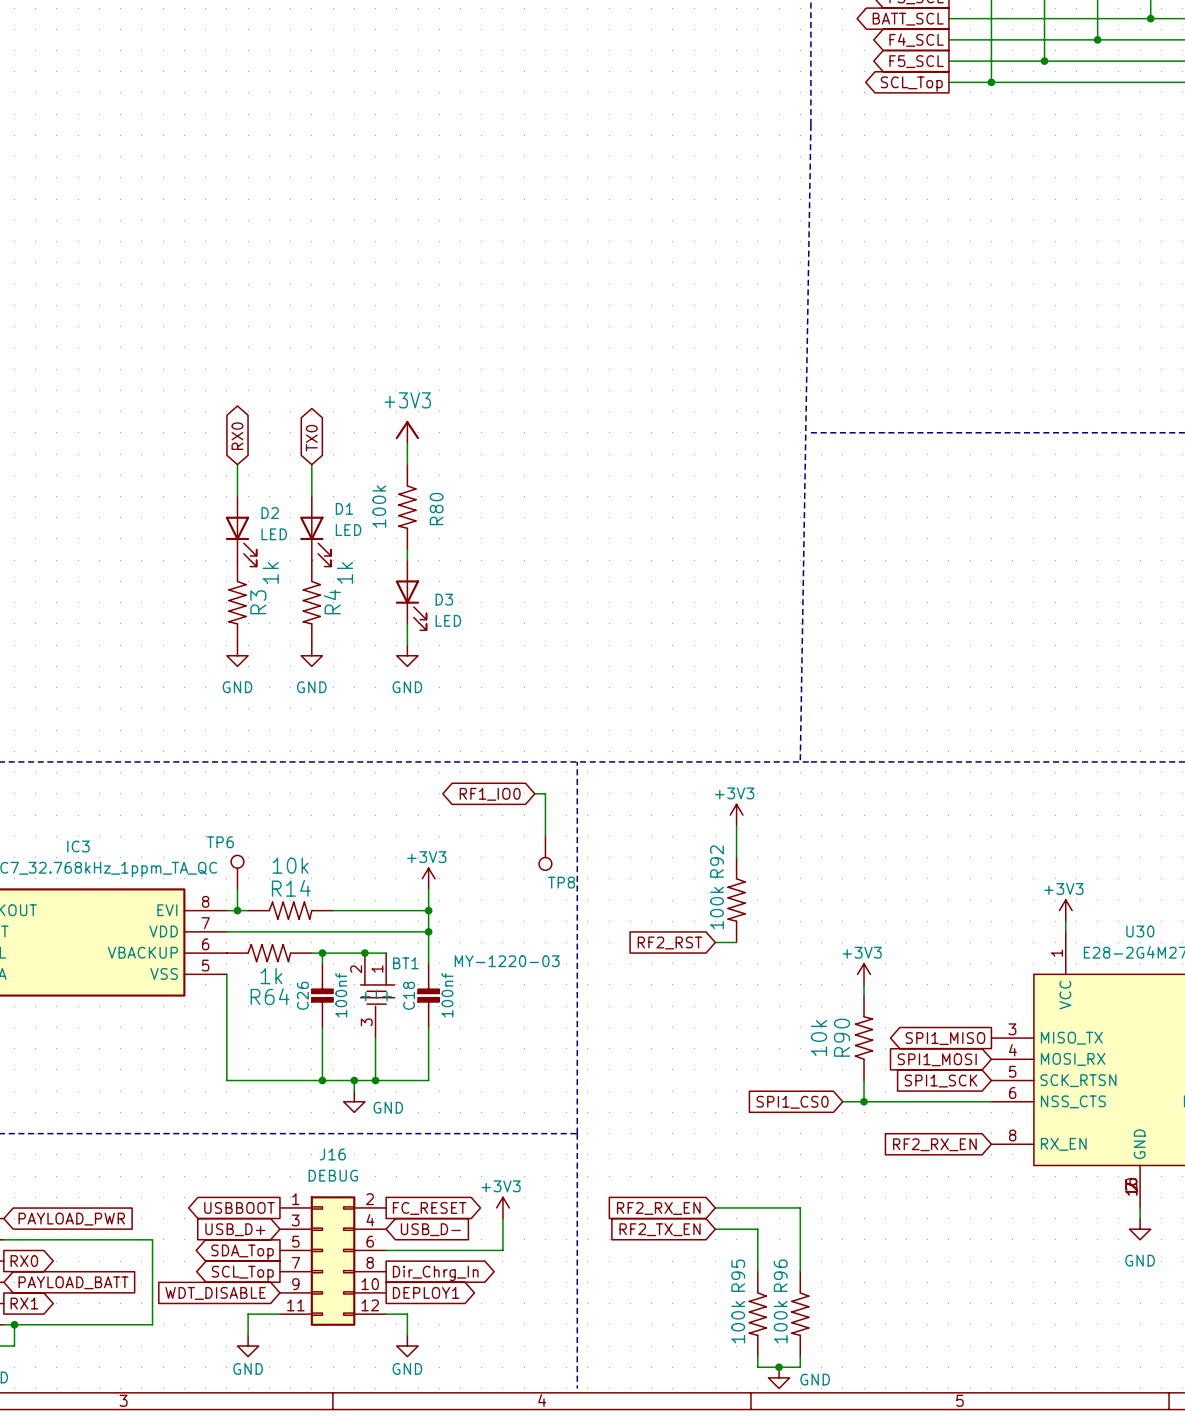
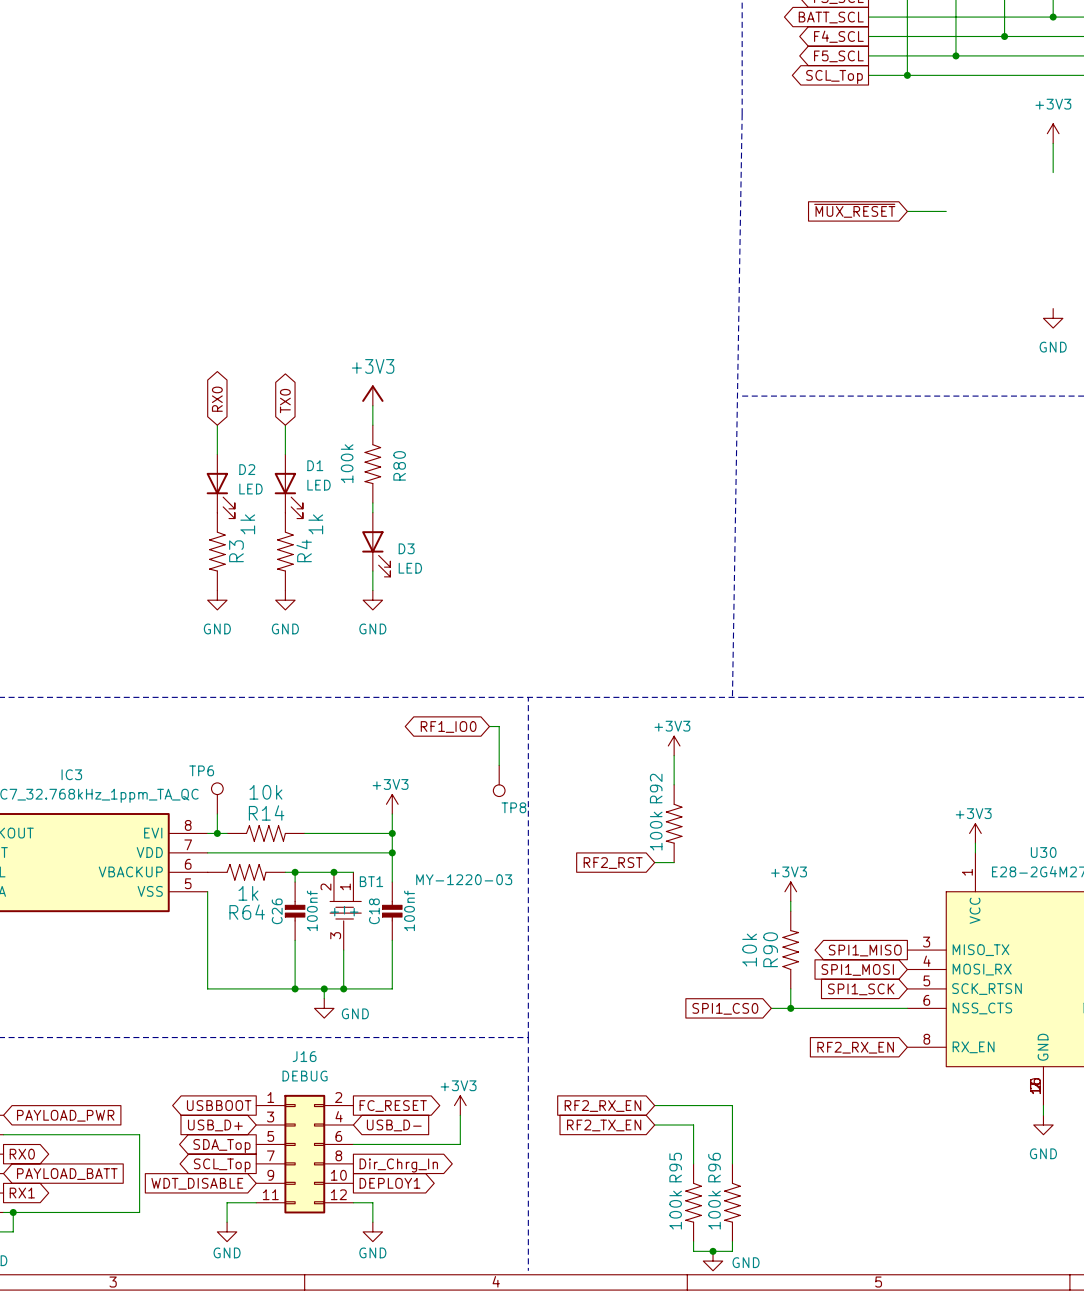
power symbol: none -> +3V3 (1053, 133)
wire: none -> (1053, 143) (1053, 172)
global label: none -> ~{MUX_RESET} (854, 210)
wire: none -> (907, 211) (946, 211)
power symbol: none -> GND (1053, 318)

